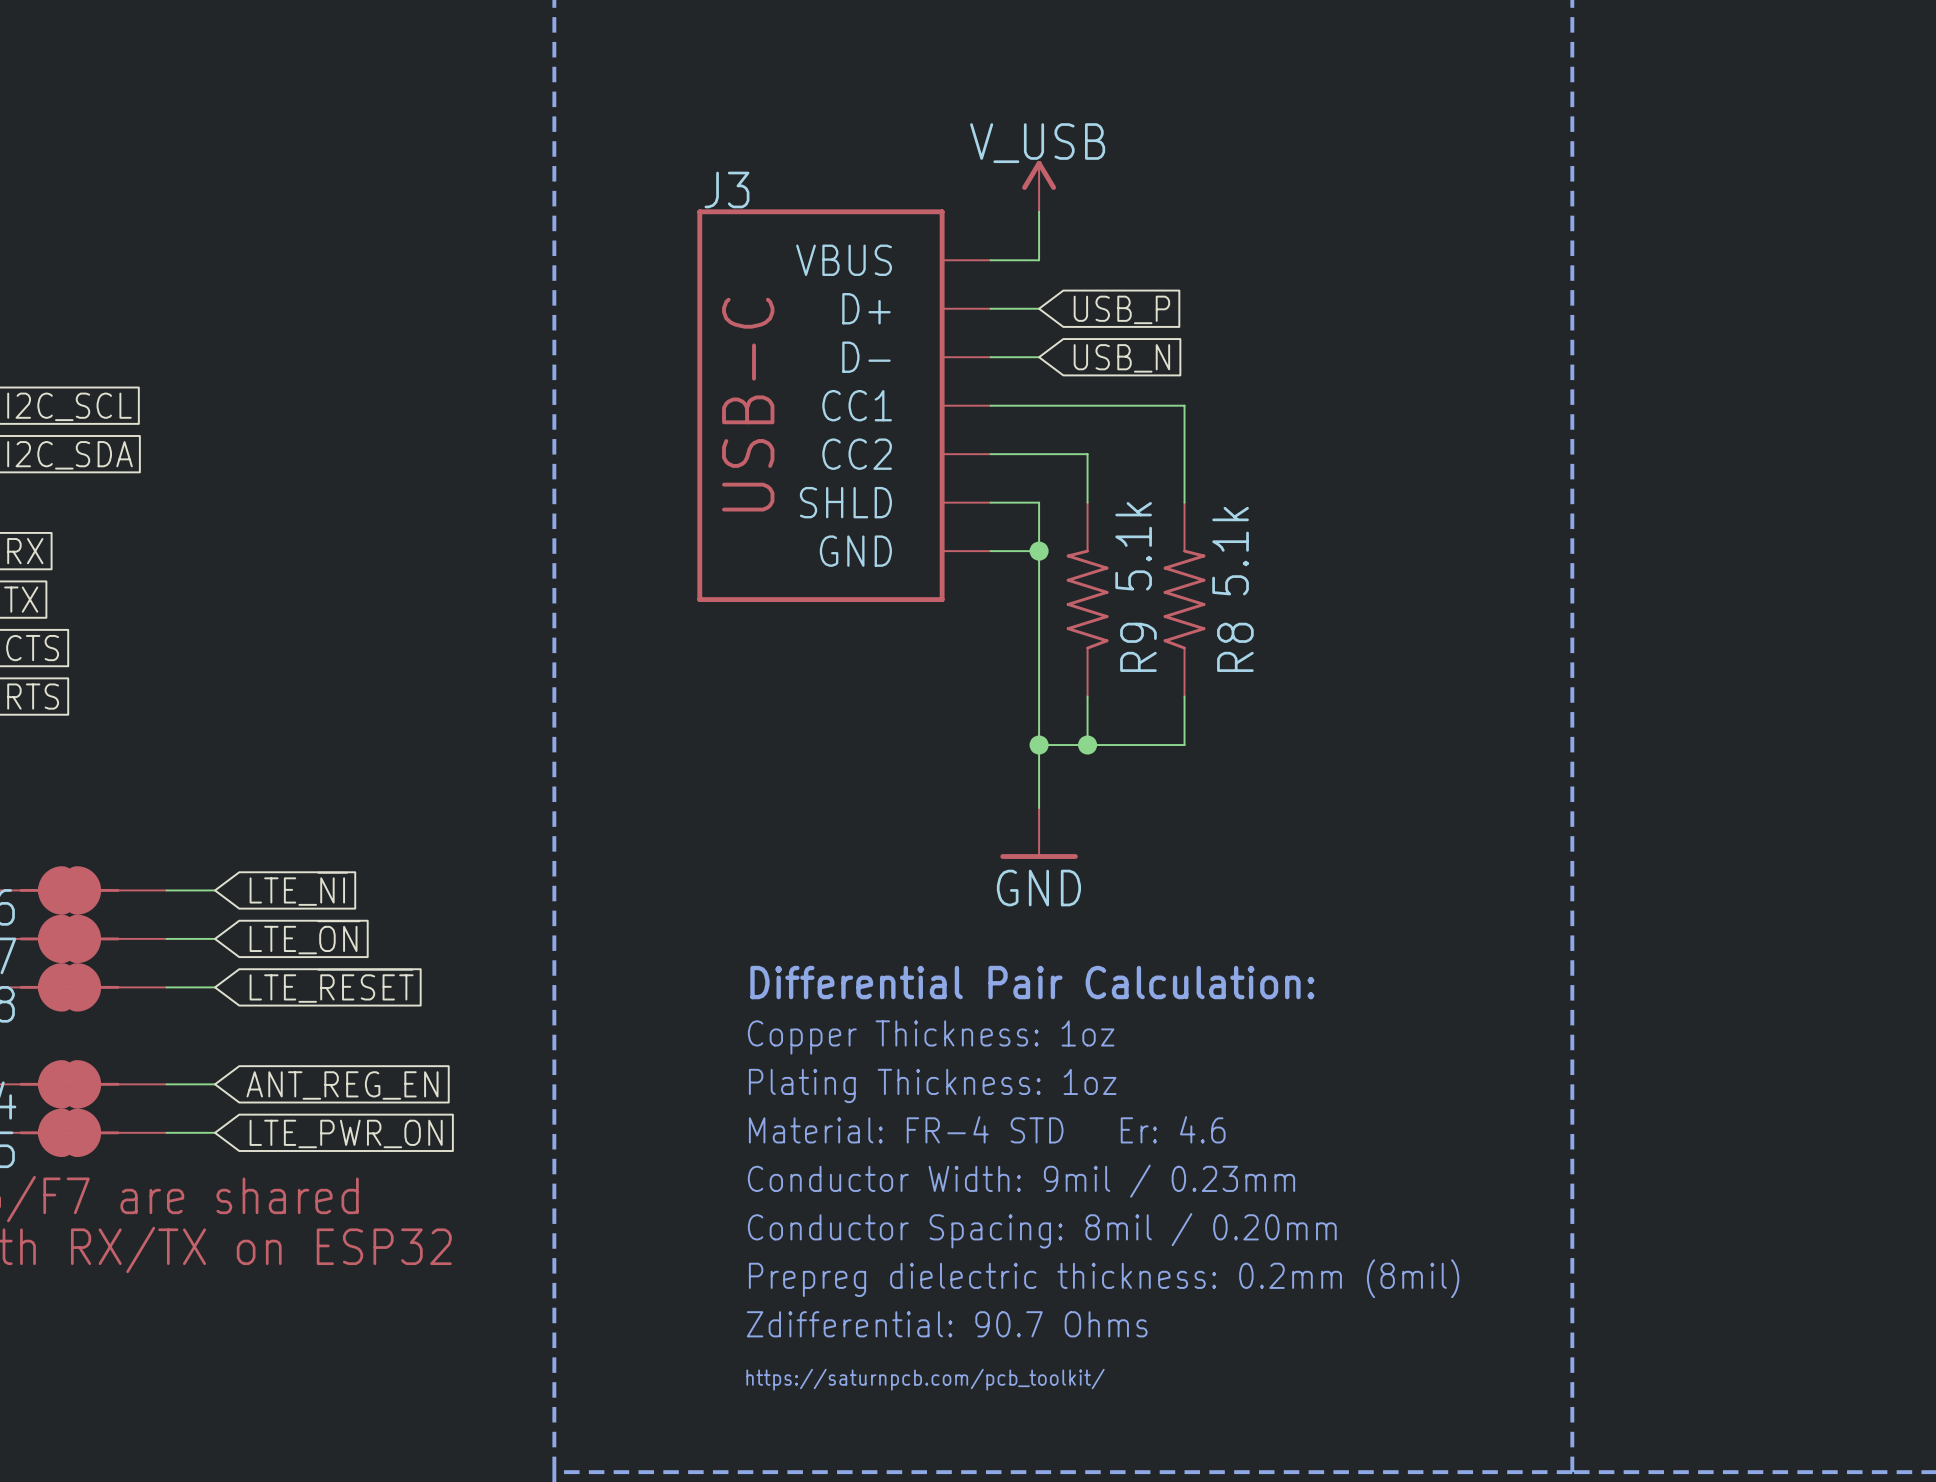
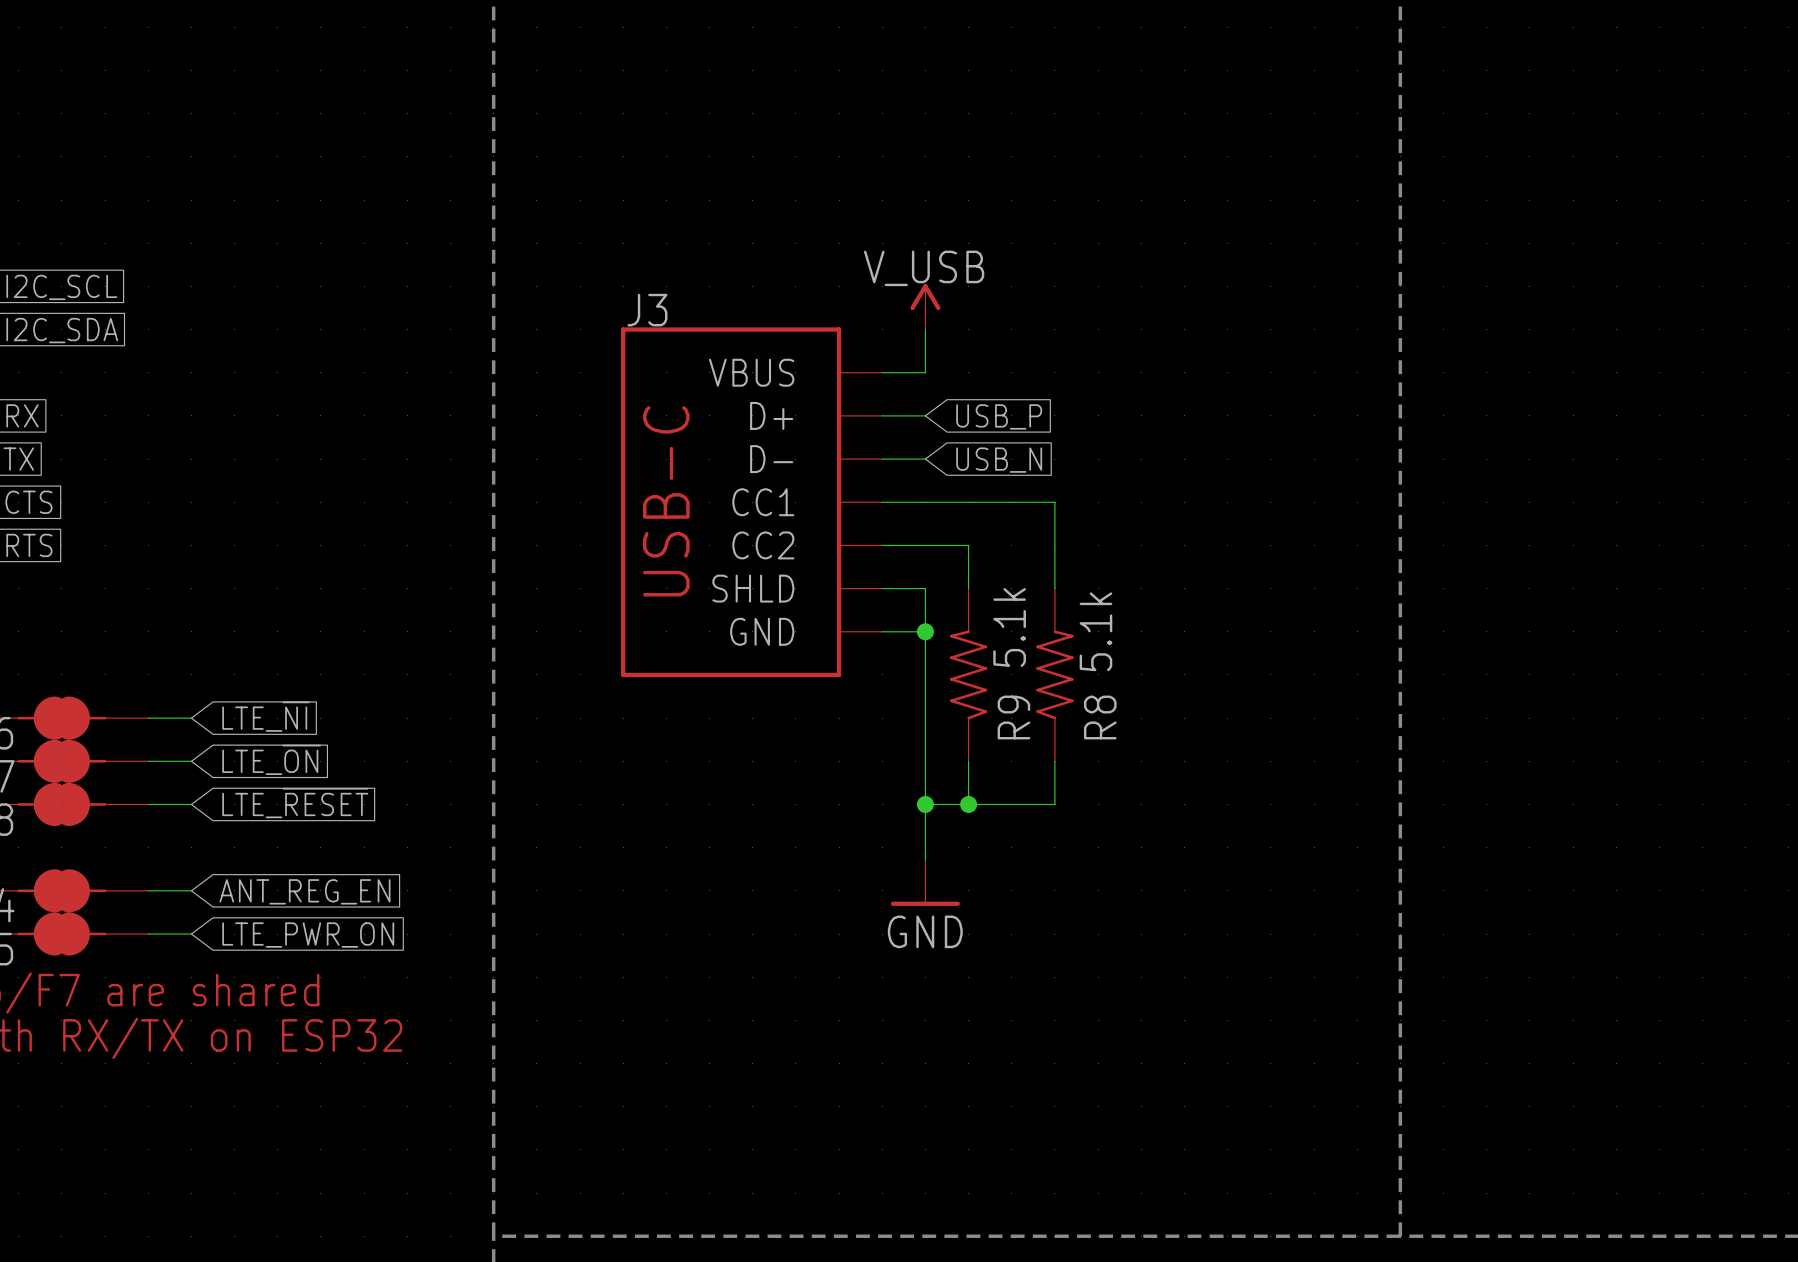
power symbol position: V_USB (1039, 186) -> V_USB (925, 306)
wire: (1039, 211) (1039, 260) (990, 260) -> none
wire: (990, 308) (1039, 308) -> (882, 588) (925, 588)
global label position: USB_P (1121, 309) -> USB_P (999, 416)
wire: (990, 357) (1039, 357) -> (882, 631) (925, 631)
global label position: USB_N (1121, 358) -> USB_N (999, 460)
J3 position: (843, 405) -> (751, 502)
wire: (990, 405) (1184, 405) (1184, 502) -> none
wire: (990, 454) (1087, 454) (1087, 502) -> none
wire: (1039, 502) (1039, 745) (1184, 745) -> (925, 372) (925, 329)
junction: (1039, 551) -> none
wire: none -> (882, 459) (925, 459)
R9 position: (1087, 599) -> (968, 674)
R8 position: (1184, 599) -> (1054, 674)
wire: none -> (882, 502) (1054, 502) (1054, 545)
wire: none -> (882, 545) (968, 545)
junction: (1039, 745) -> none
junction: (1087, 745) -> none
junction: none -> (925, 631)
wire: none -> (925, 644) (925, 860)
power symbol position: GND (1039, 833) -> GND (925, 883)
wire: none -> (968, 761) (968, 804)
wire: none -> (1054, 761) (1054, 804) (925, 804)
text: Differential Pair Calculation: (1032, 982) -> none
junction: none -> (925, 804)
junction: none -> (968, 804)
text: Copper Thickness: 1oz (931, 1037) -> none
text: Plating Thickness: 1oz (932, 1085) -> none
text: Material: FR-4 STD Er: 4.6 (987, 1129) -> none
text: Conductor Width: 9mil / 0.23mm (1021, 1181) -> none
text: Conductor Spacing: 8mil / 0.20mm (1042, 1230) -> none
text: Prepreg dielectric thickness: 0.2mm (8mil) (1104, 1278) -> none
text: Zdifferential: 90.7 Ohms (947, 1324) -> none
text: https://saturnpcb.com/pcb_toolkit/ (925, 1379) -> none

